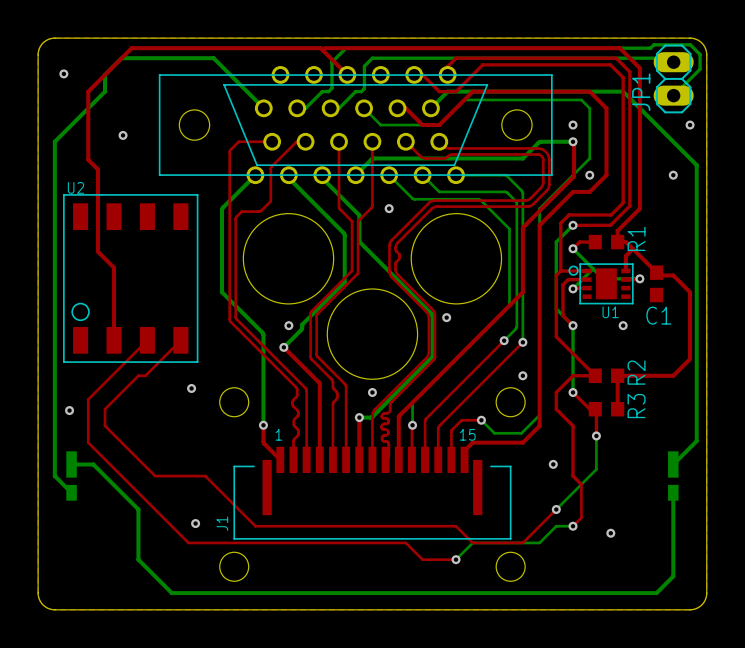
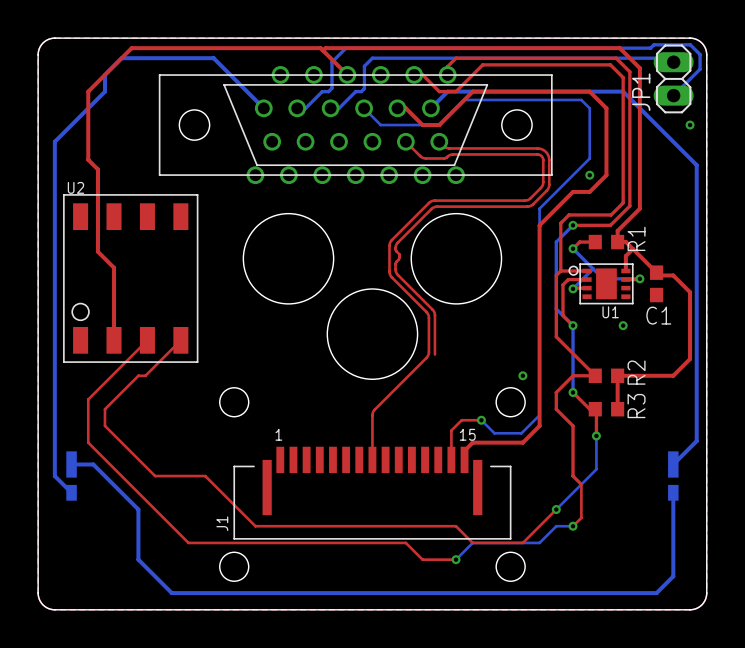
via: (63, 73) -> none
via: (573, 125) -> none
via: (123, 135) -> none
top track: (272, 141) (238, 141) (229, 151) (229, 319) (296, 388) (297, 395) (292, 404) (298, 412) (293, 424) (298, 433) (293, 440) (293, 459) -> none
top track: (305, 141) (295, 142) (271, 167) (270, 201) (260, 211) (241, 211) (235, 217) (235, 316) (306, 389) (306, 459) -> none
top track: (339, 141) (339, 207) (352, 221) (352, 270) (310, 313) (310, 357) (332, 380) (333, 388) (337, 393) (337, 398) (332, 404) (332, 459) -> none
top track: (372, 141) (372, 206) (358, 221) (358, 273) (316, 315) (316, 355) (346, 385) (346, 459) -> none
top track: (573, 141) (574, 176) (522, 228) (522, 292) (399, 415) (398, 459) -> none
bottom track: (573, 141) (540, 141) (522, 158) (373, 158) (355, 175) -> none
via: (573, 141) -> none
bottom track: (255, 175) (222, 209) (222, 292) (263, 334) (263, 425) -> none
bottom track: (288, 175) (289, 179) (344, 233) (344, 282) (302, 324) (301, 329) (283, 347) -> none
bottom track: (322, 175) (323, 179) (359, 215) (360, 242) (432, 315) (432, 356) (372, 416) (359, 417) -> none
bottom track: (389, 175) (413, 199) (479, 199) (509, 229) (509, 305) (413, 401) (412, 425) -> none
bottom track: (422, 175) (439, 191) (505, 191) (516, 202) (516, 327) (504, 340) -> none
bottom track: (456, 175) (506, 175) (522, 192) (522, 342) -> none
via: (673, 175) -> none
via: (389, 208) -> none
via: (446, 317) -> none
via: (288, 325) -> none
top track: (504, 340) (425, 419) (425, 459) -> none
via: (504, 340) -> none
top track: (522, 342) (438, 426) (438, 459) -> none
via: (522, 342) -> none
top track: (283, 347) (319, 383) (319, 459) -> none
via: (283, 347) -> none
top track: (434, 354) (433, 359) (390, 402) (389, 412) (382, 415) (382, 417) (388, 420) (381, 426) (388, 432) (382, 437) (382, 440) (388, 443) (388, 457) (385, 459) -> none
via: (191, 388) -> none
via: (372, 392) -> none
via: (69, 410) -> none
top track: (359, 417) (359, 459) -> none
via: (359, 417) -> none
top track: (263, 425) (263, 442) (280, 459) -> none
via: (263, 425) -> none
top track: (412, 425) (411, 459) -> none
via: (412, 425) -> none
via: (553, 464) -> none
via: (195, 523) -> none
via: (610, 533) -> none

